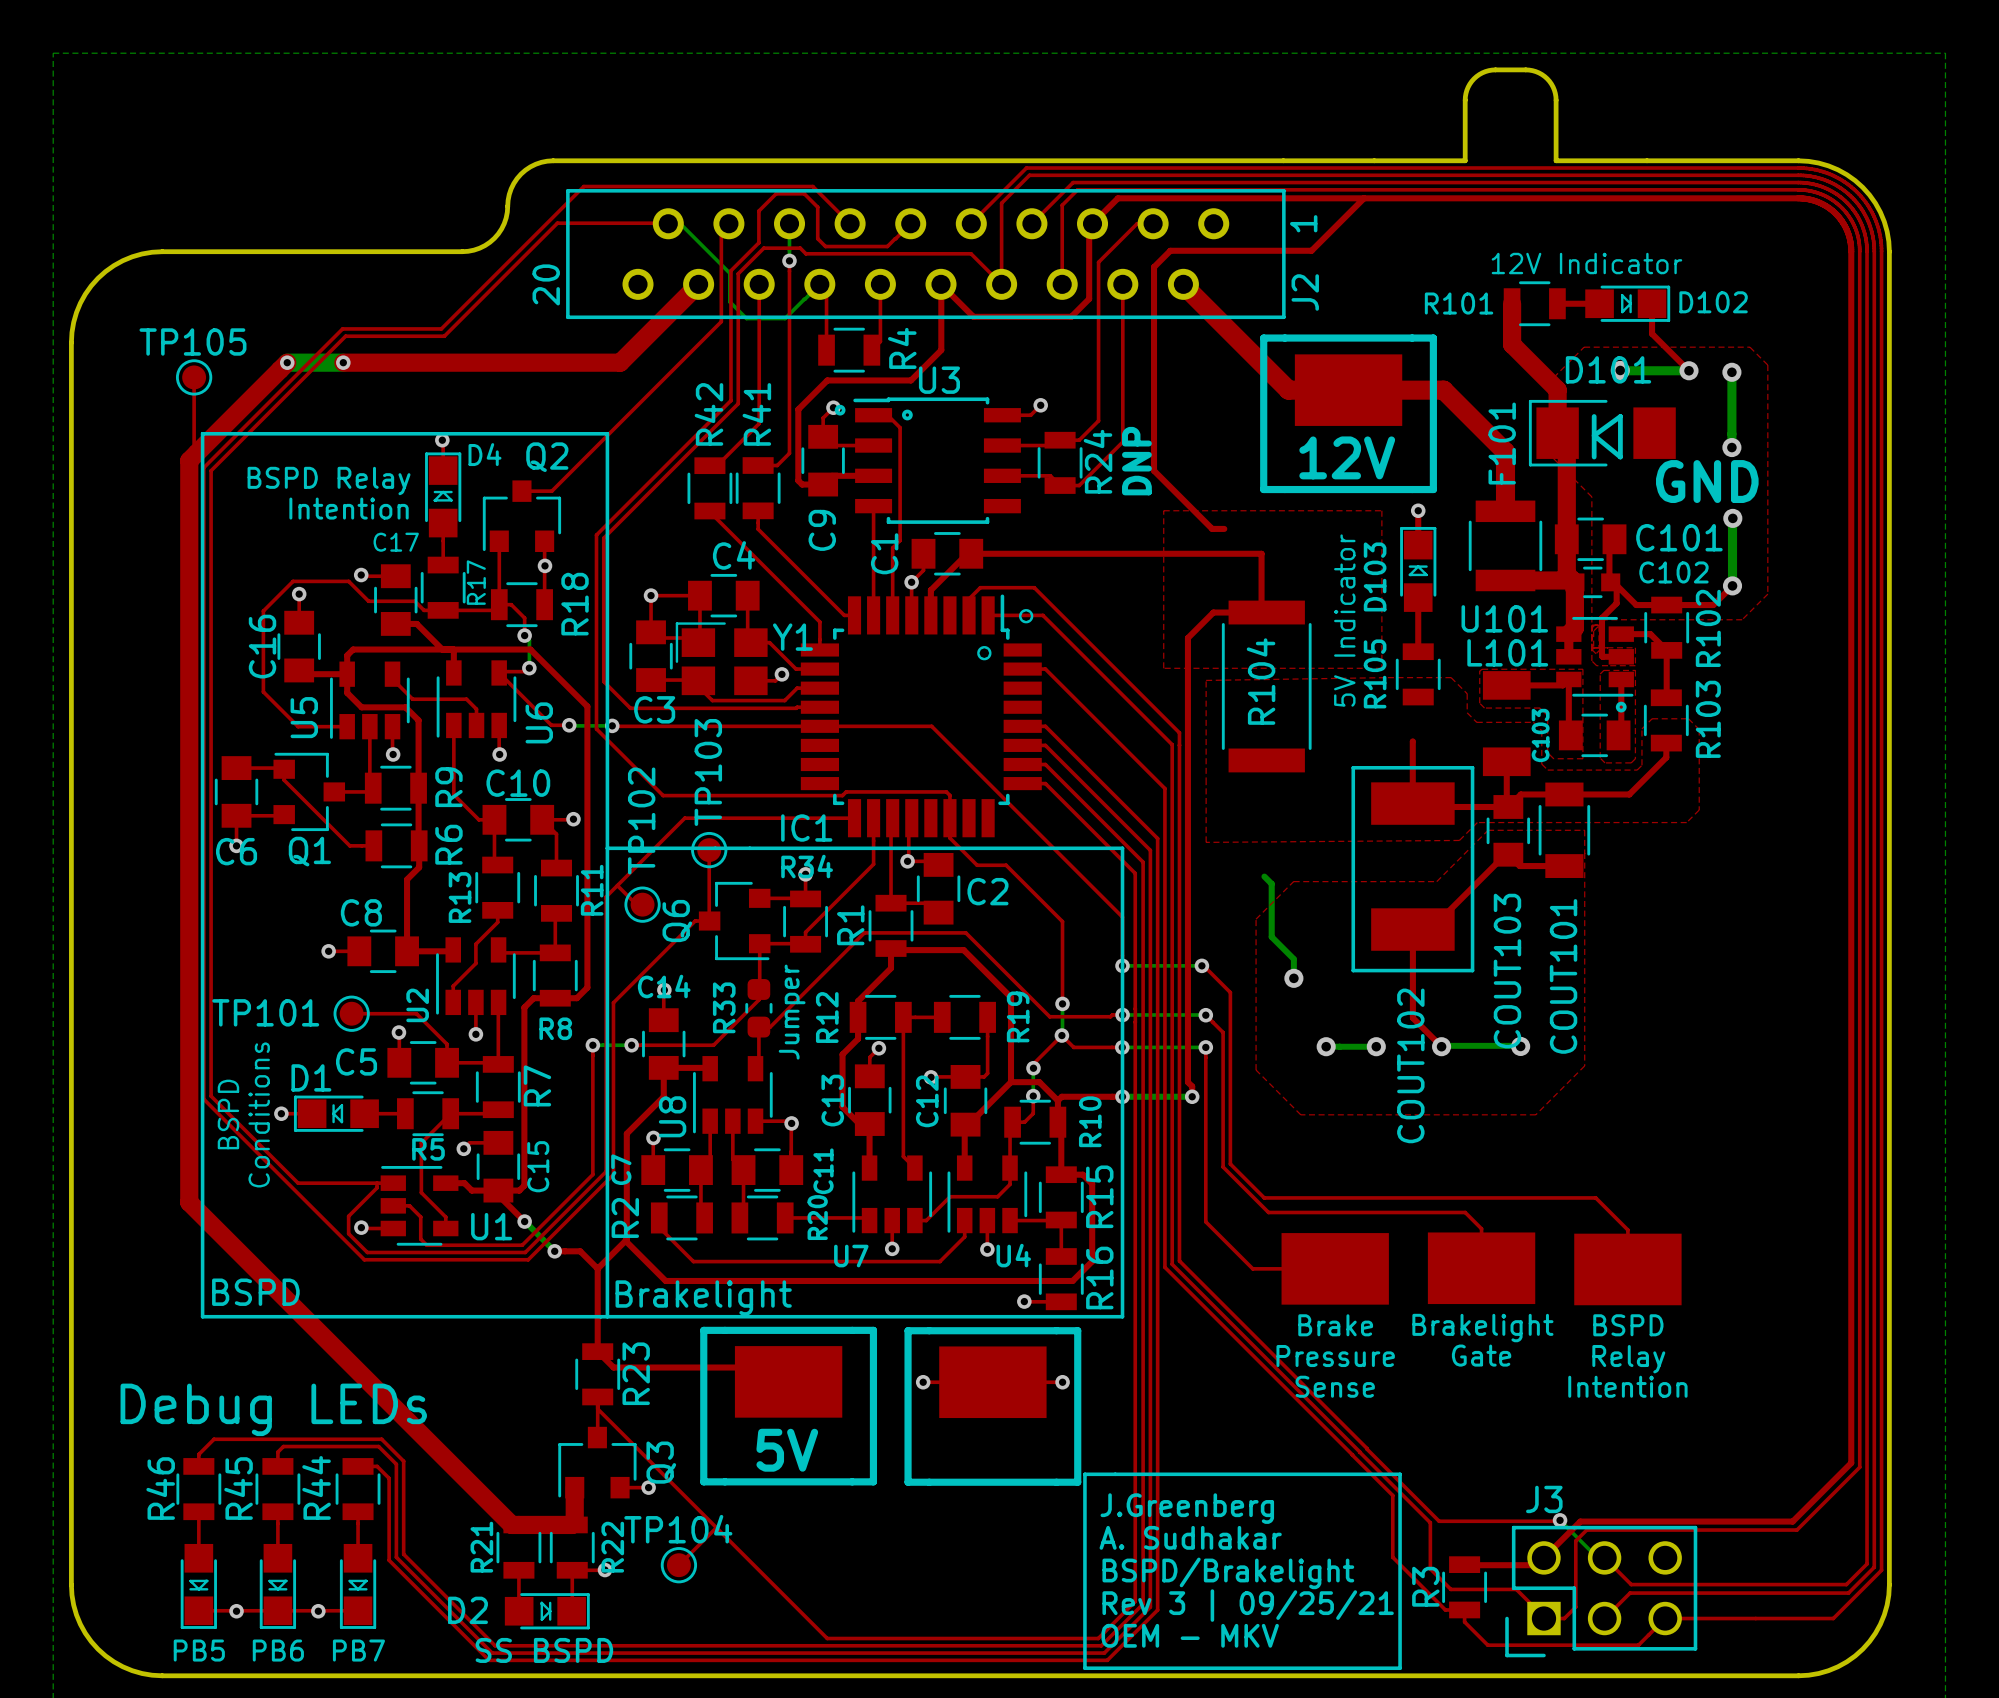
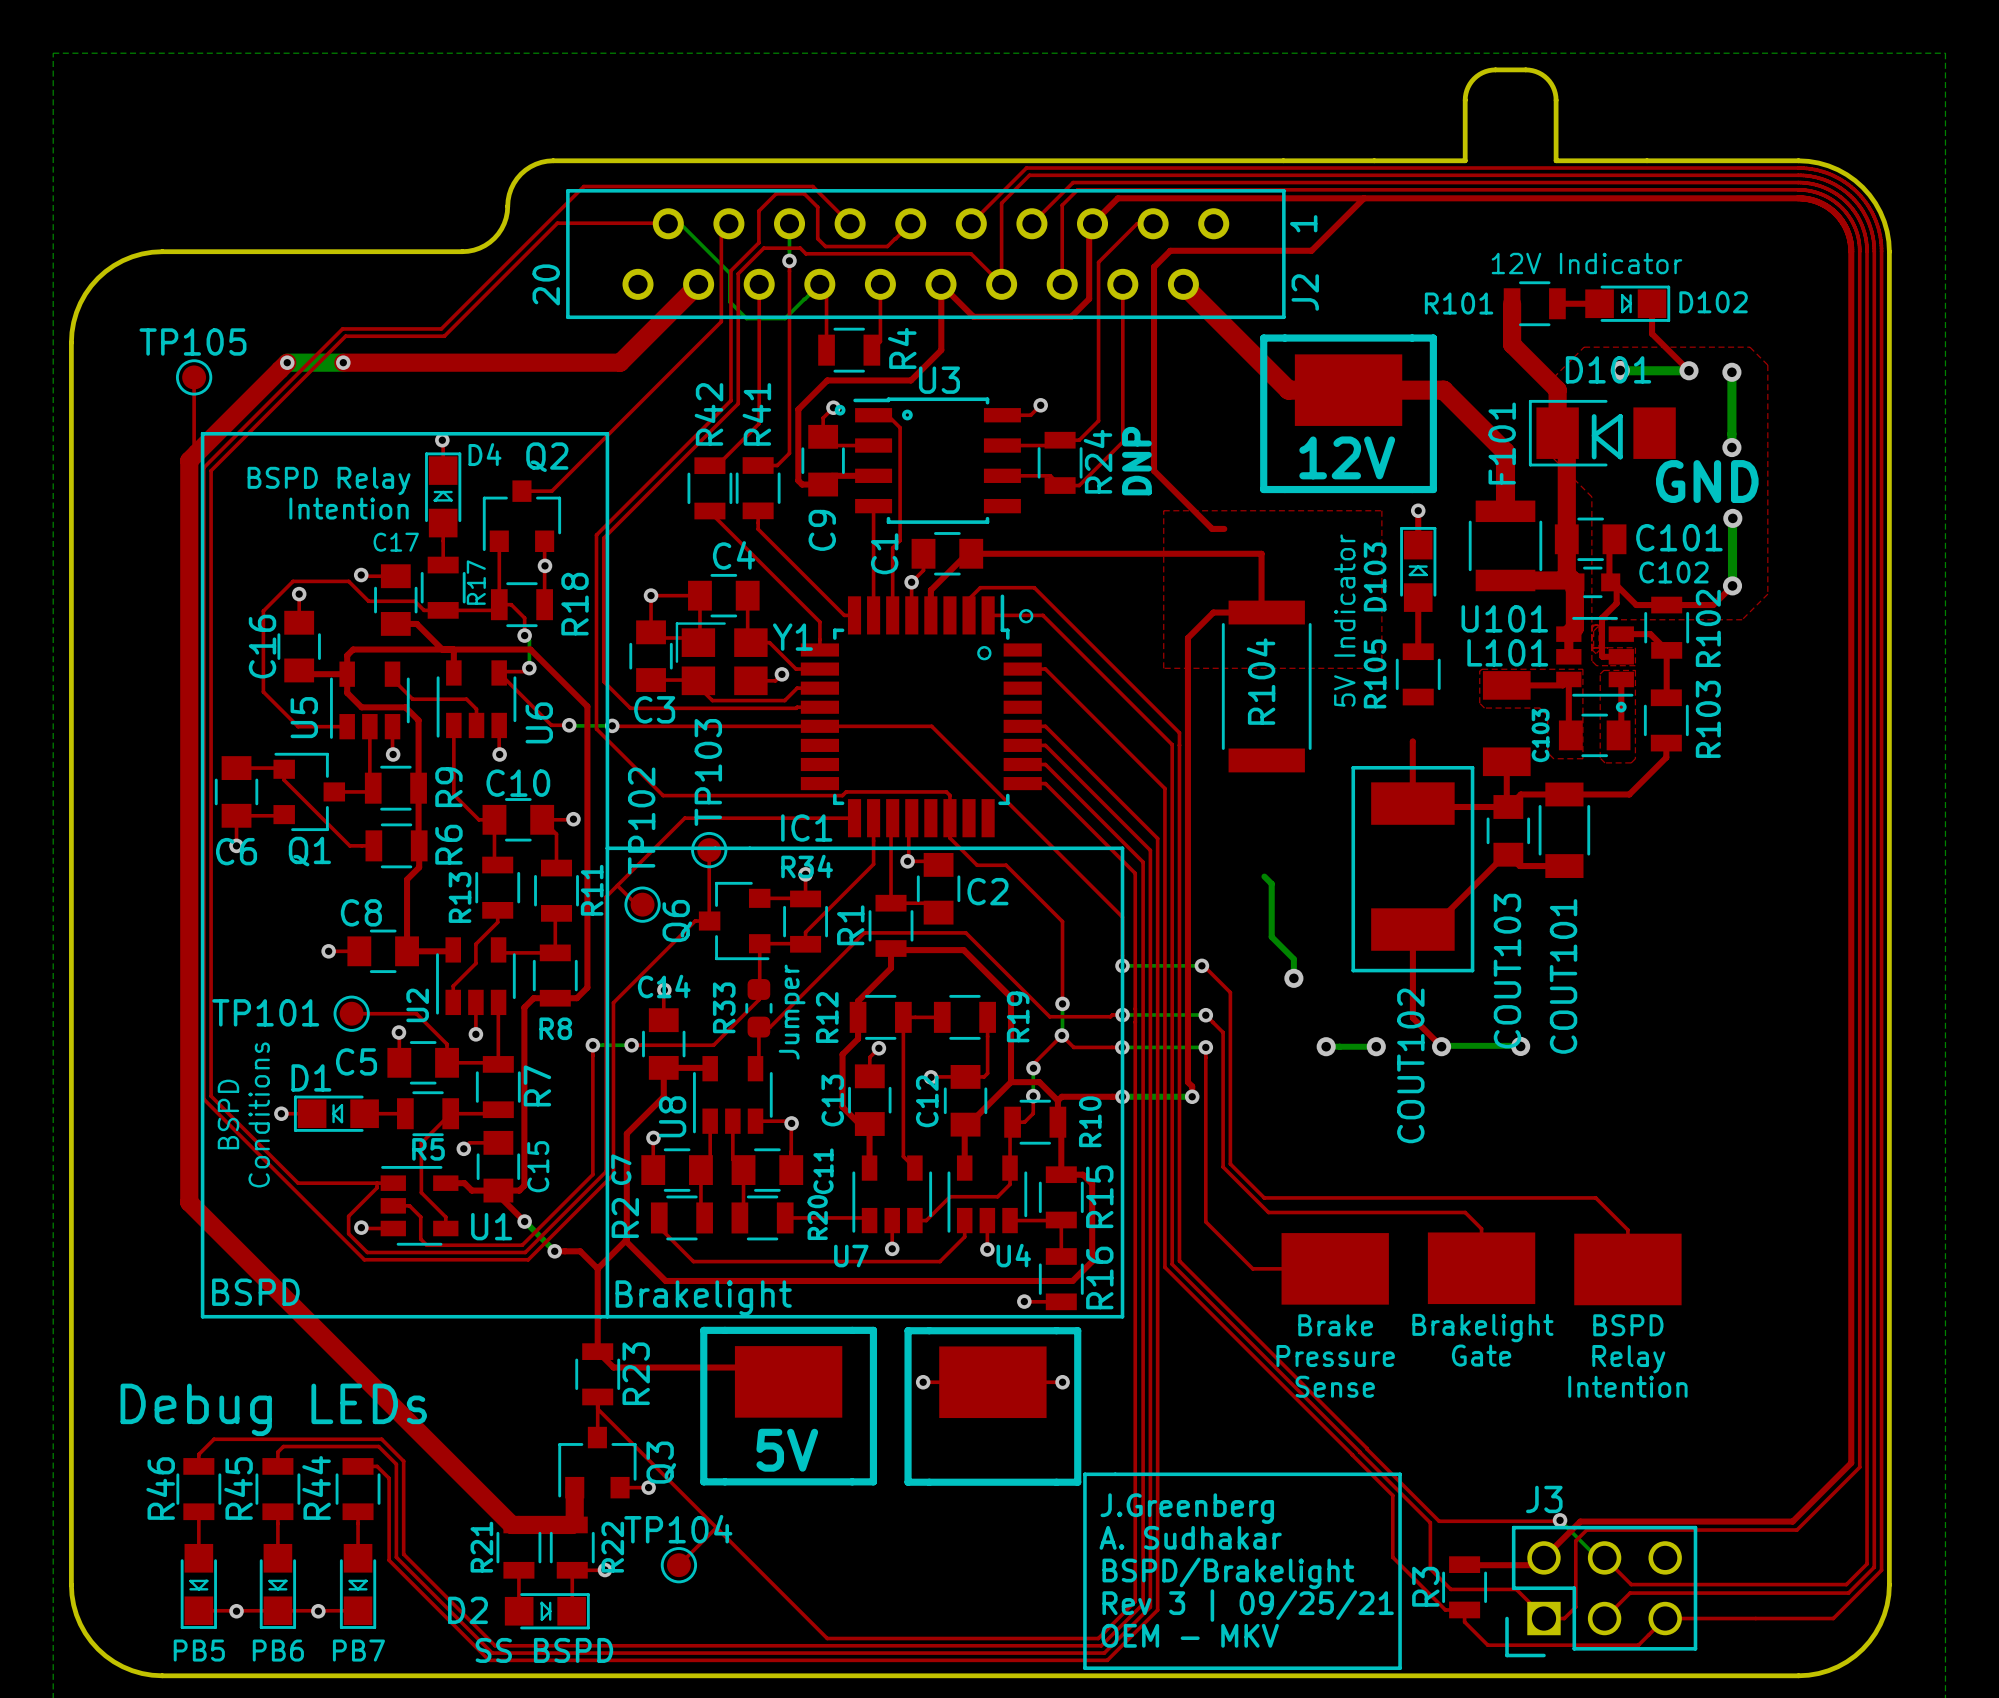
top zone outline: (1387, 677) (1206, 680) (1206, 842) (1459, 840) (1477, 822) (1686, 822) (1699, 810) (1699, 729) (1688, 718) (1652, 718) (1641, 728) (1641, 765) (1637, 770) (1547, 770) (1541, 764) (1541, 730) (1533, 722) (1476, 722) (1467, 712) (1467, 693) (1451, 677) (1387, 677) -> none
top zone outline: (1488, 830) (1436, 881) (1293, 881) (1256, 919) (1256, 1070) (1300, 1114) (1535, 1114) (1584, 1065) (1584, 830) (1488, 830) -> none

